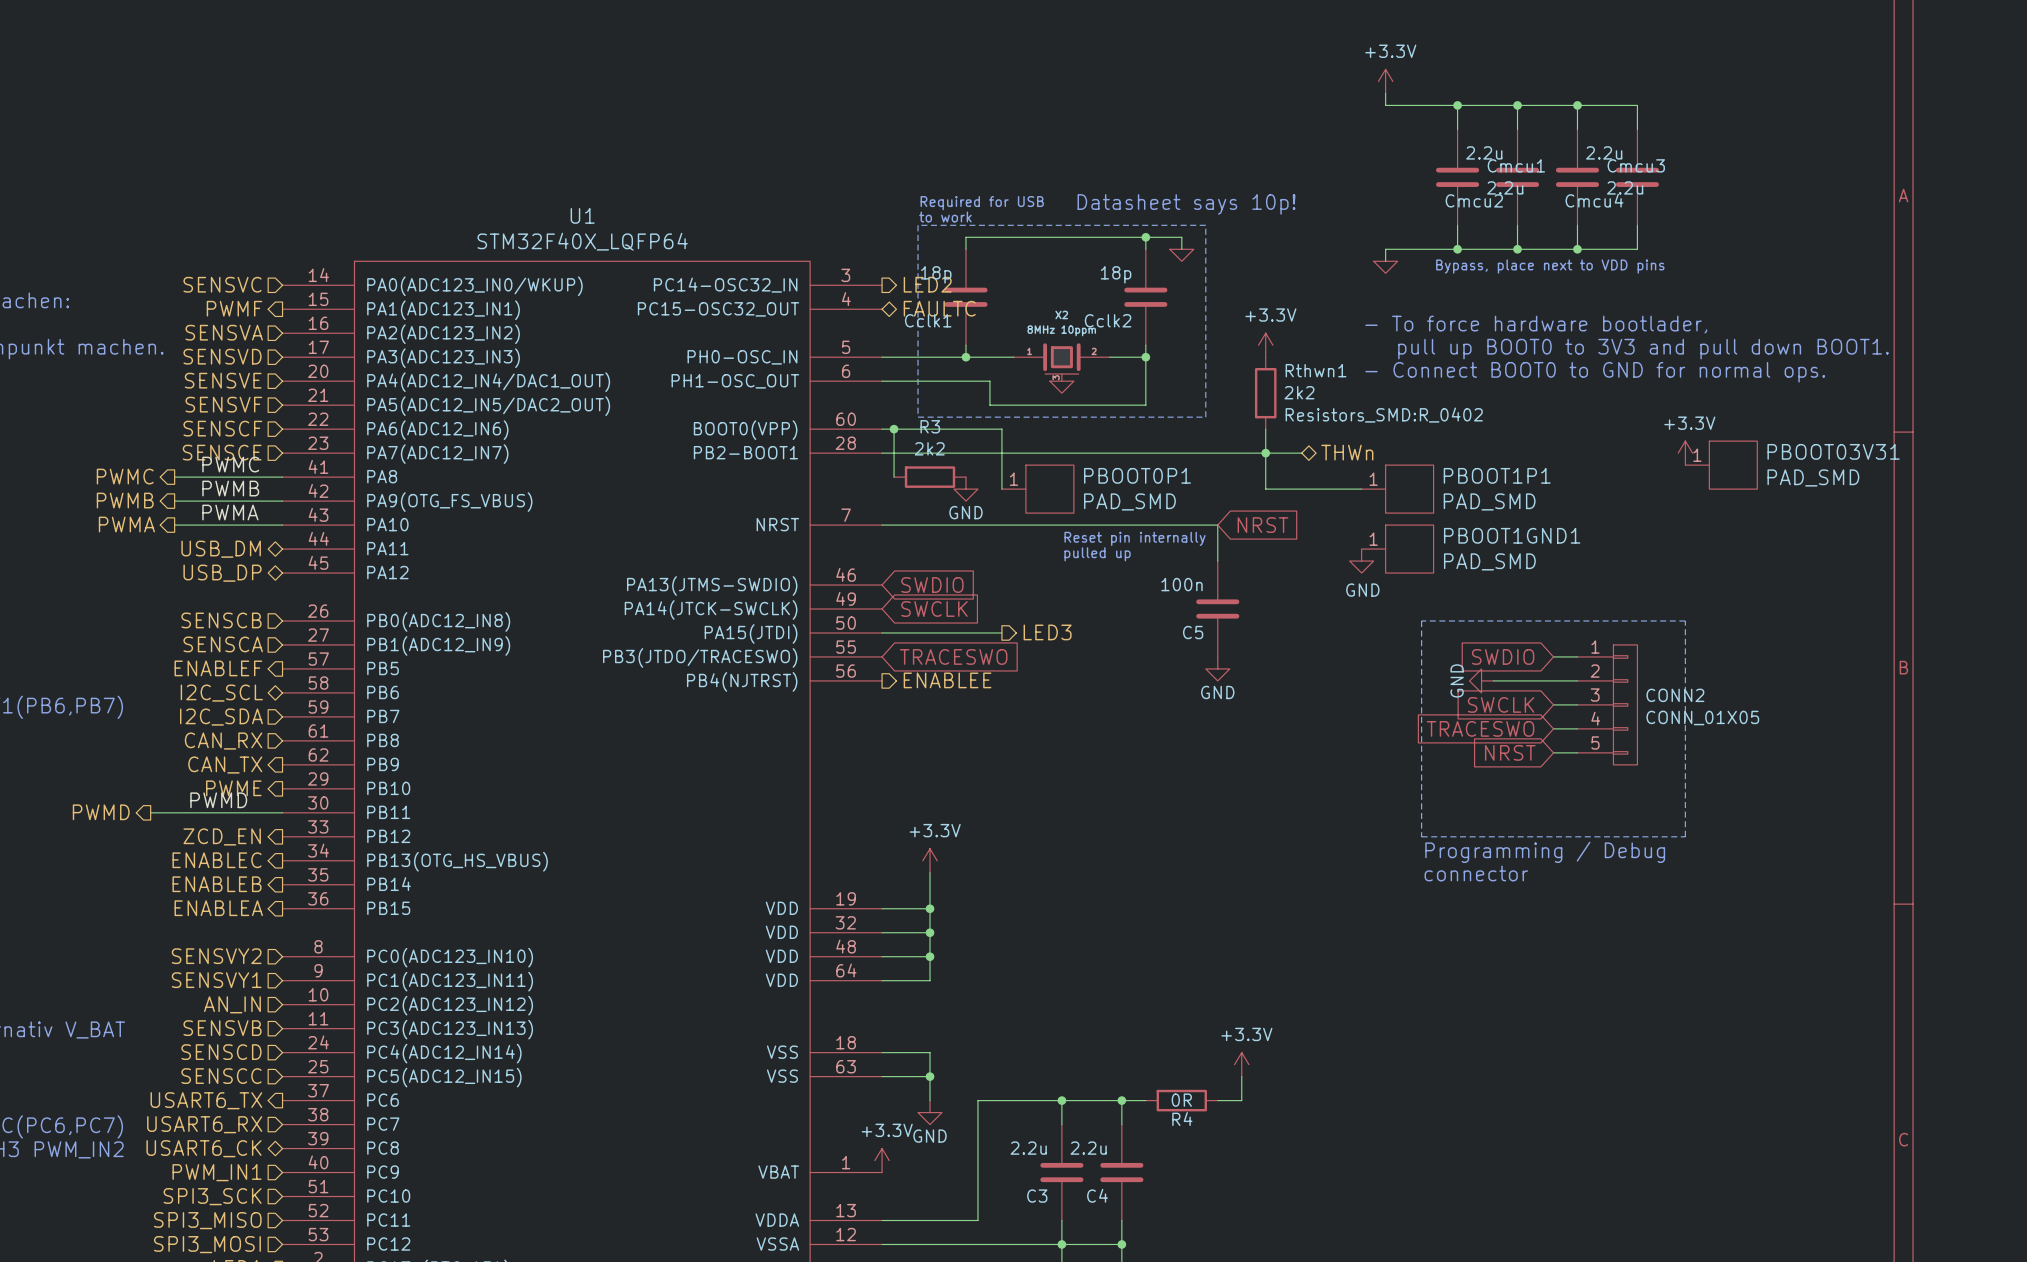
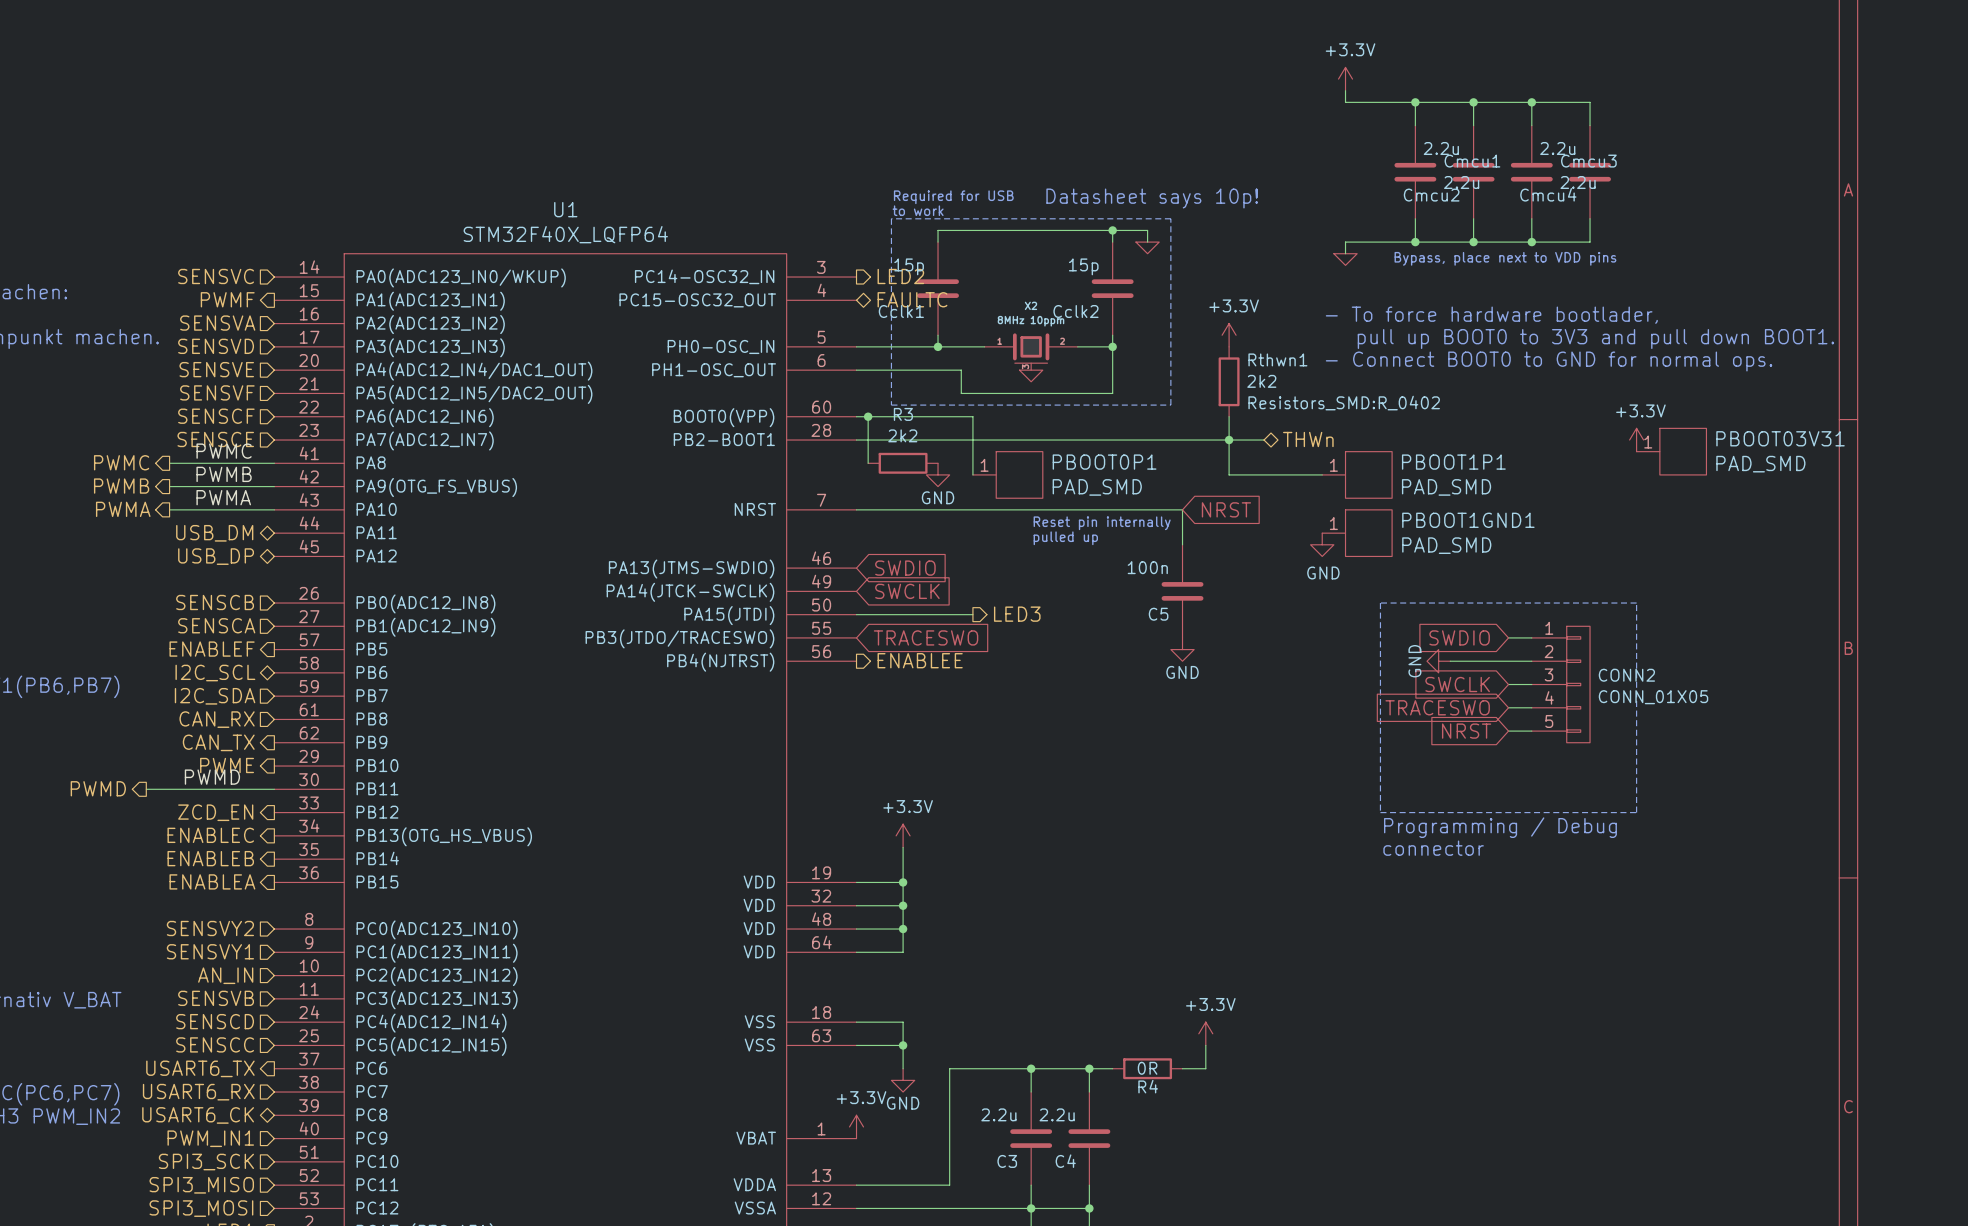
Cclk1 value: 18p (936, 274) -> 15p (909, 266)
Cclk2 value: 18p (1116, 274) -> 15p (1083, 266)

